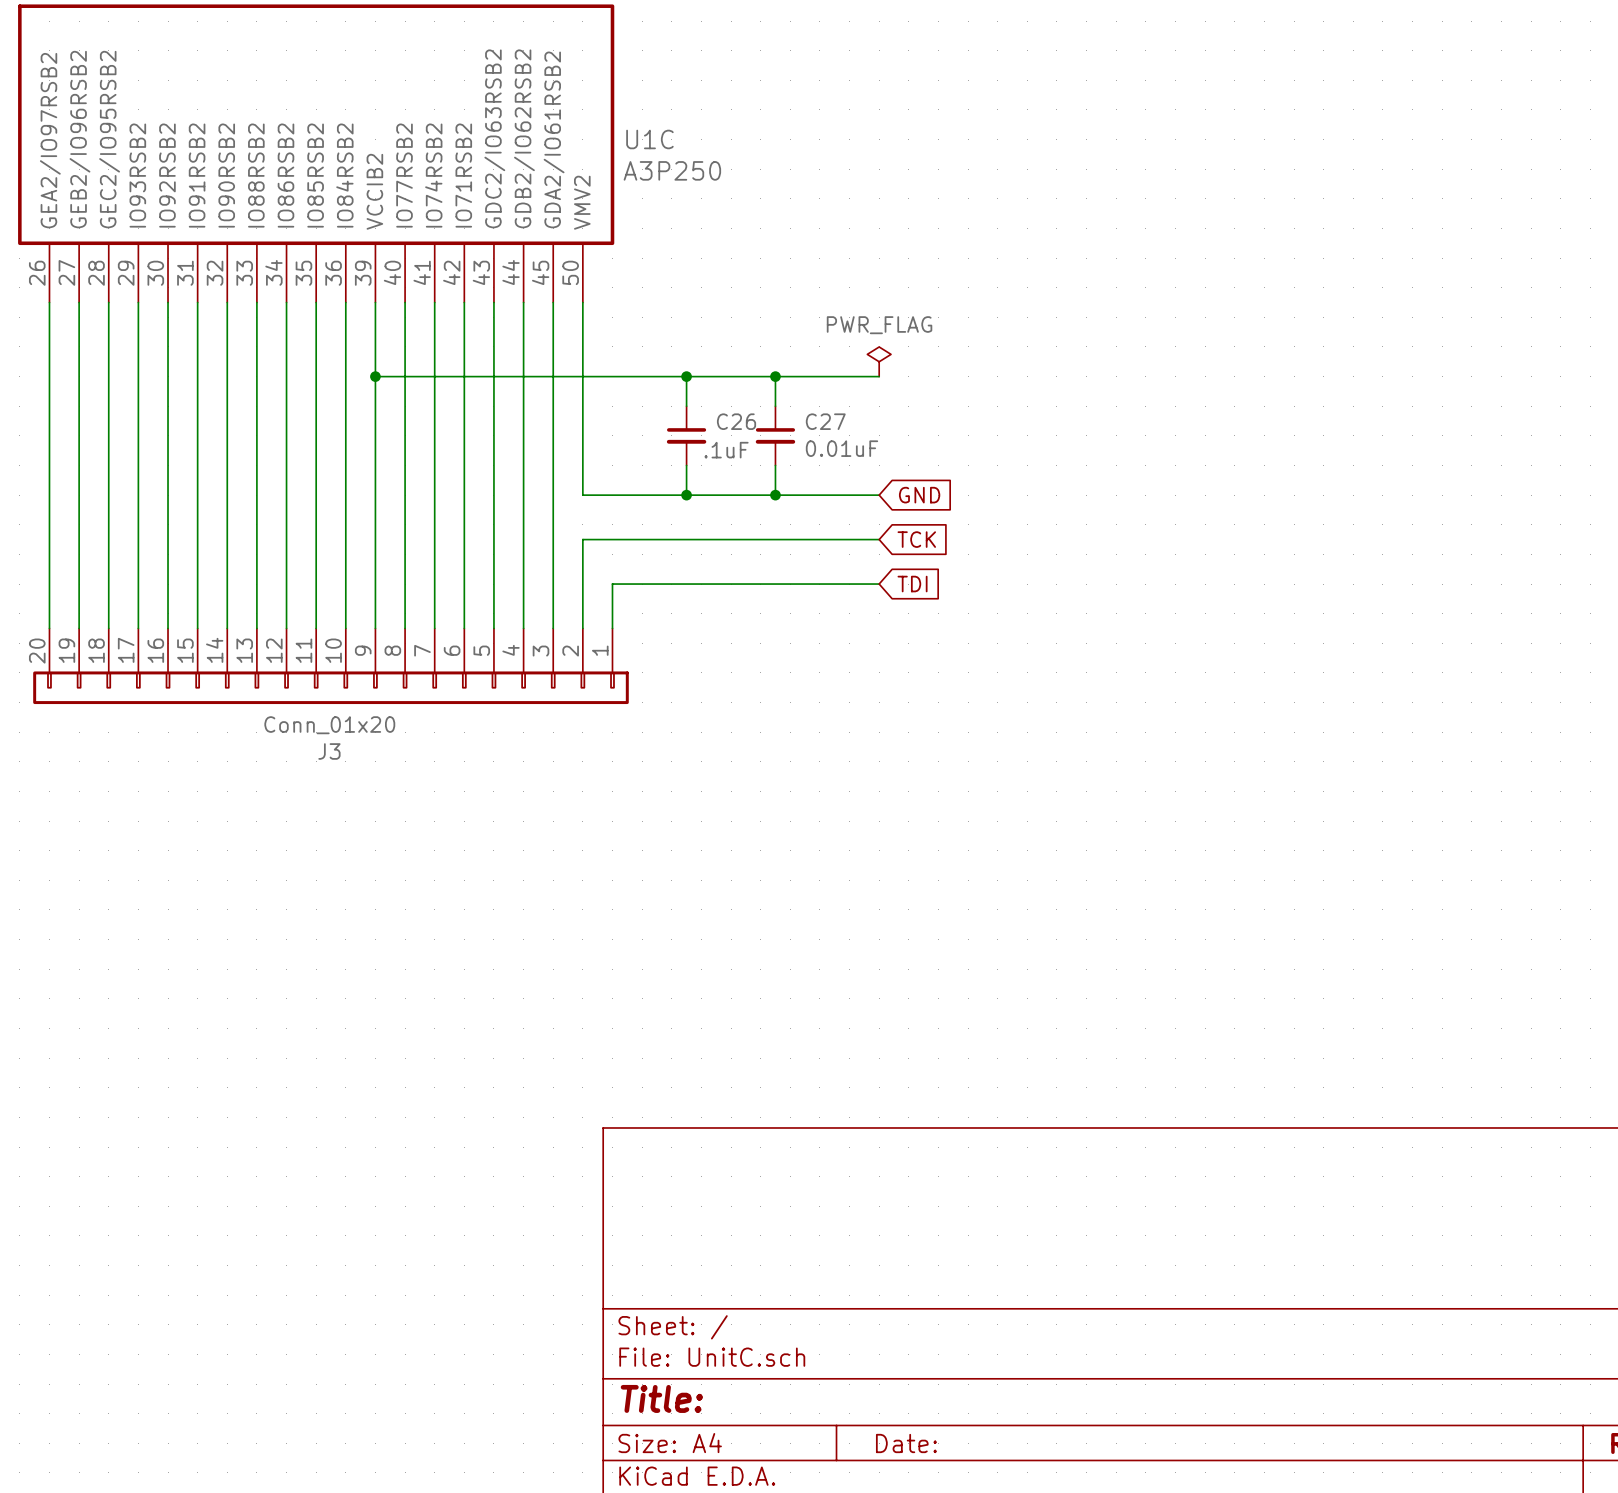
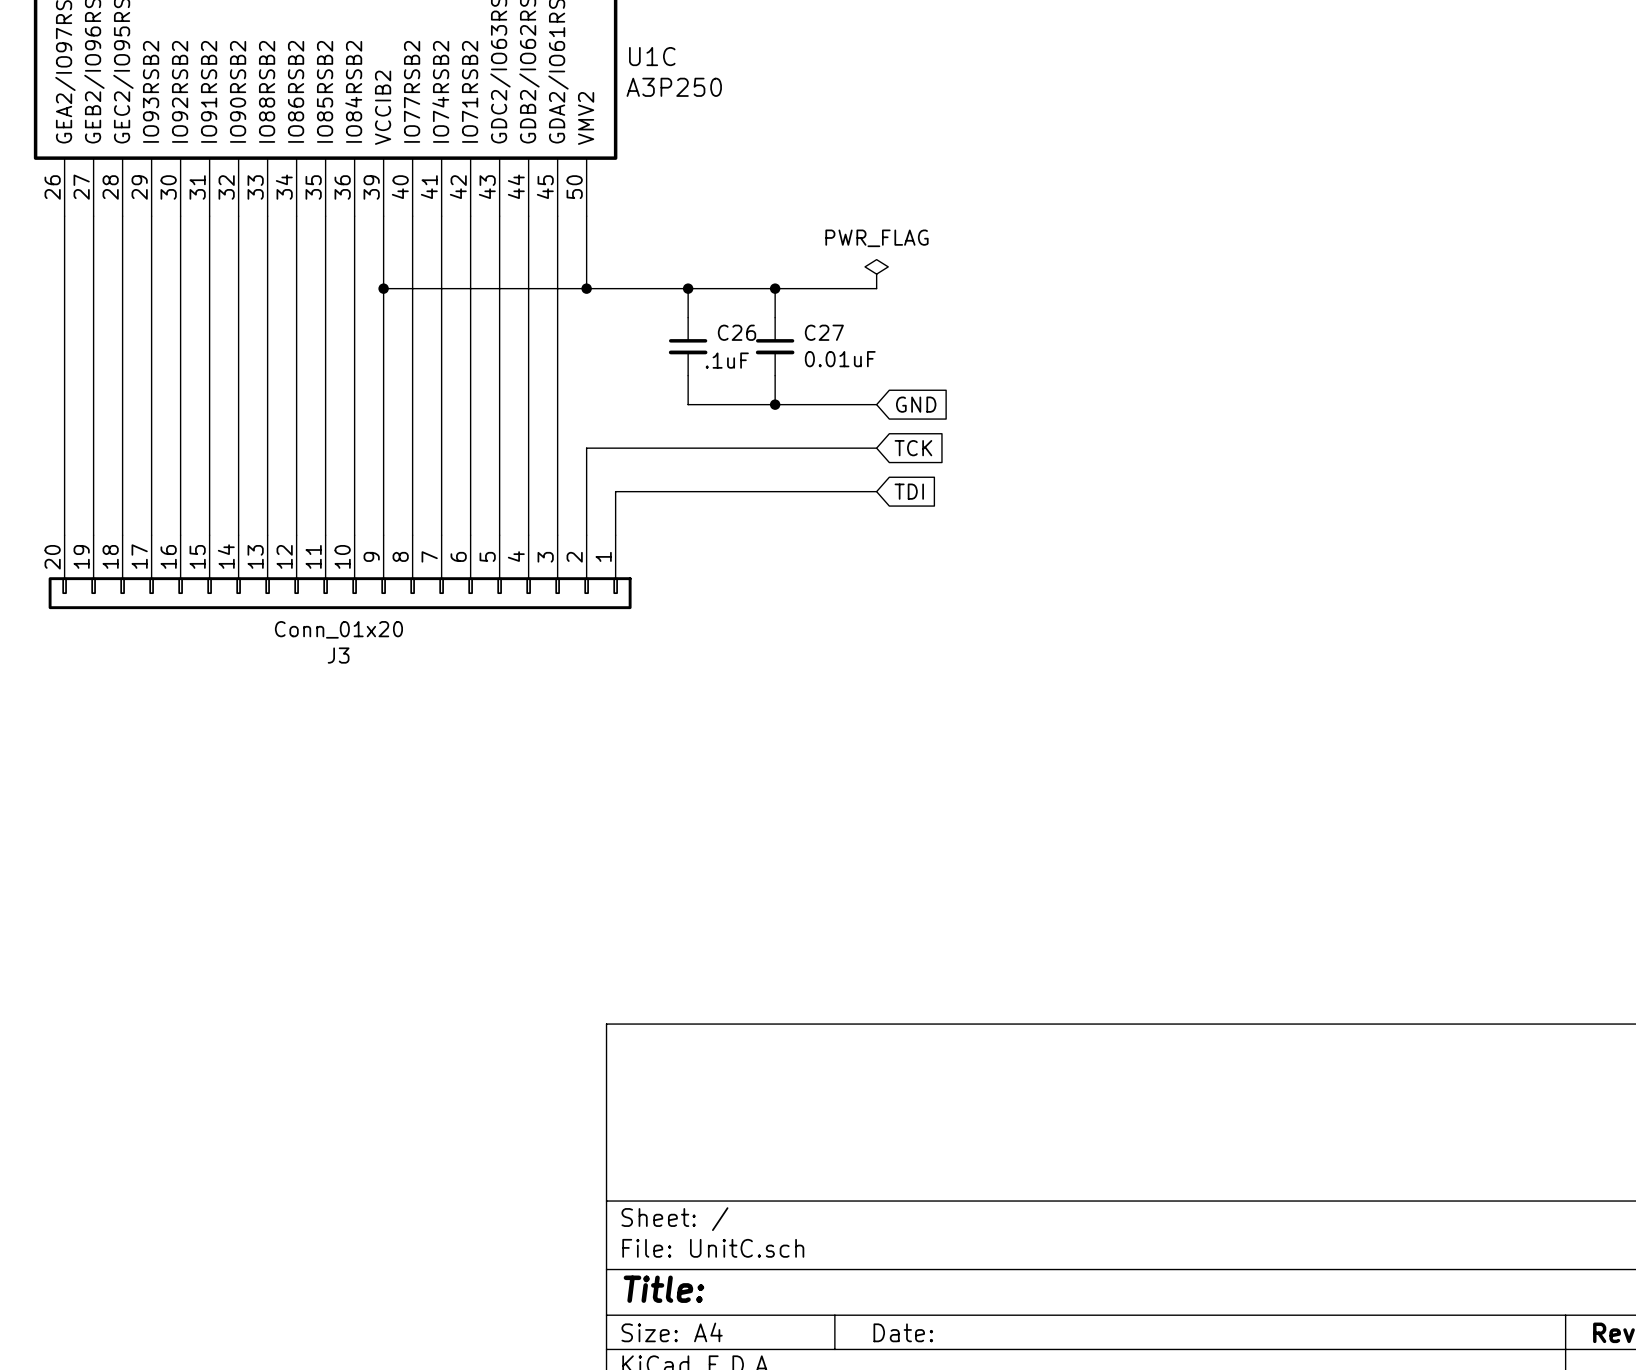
wire: (582, 376) (582, 495) (686, 495) -> none
junction: none -> (586, 288)
junction: (686, 495) -> none

